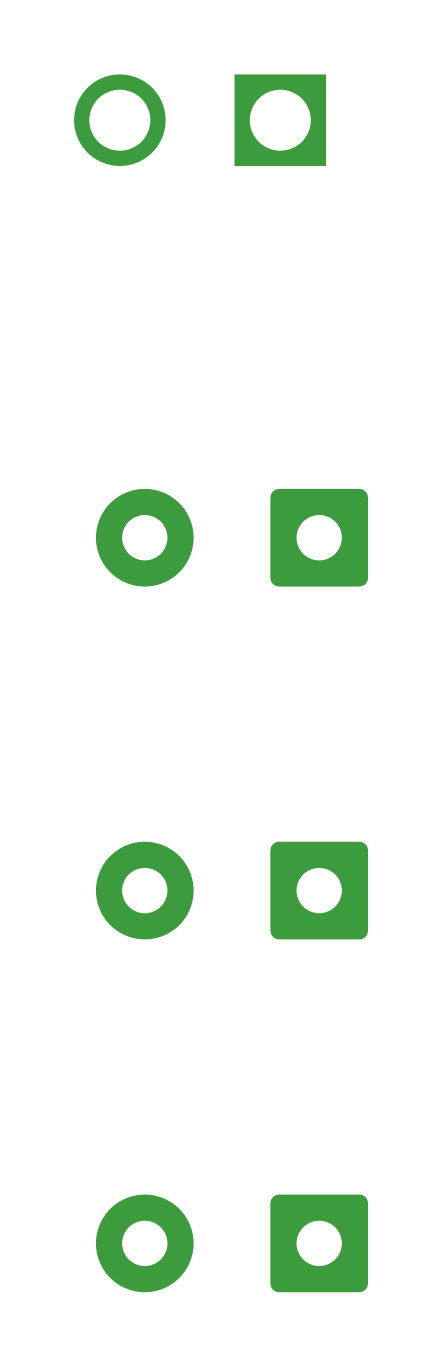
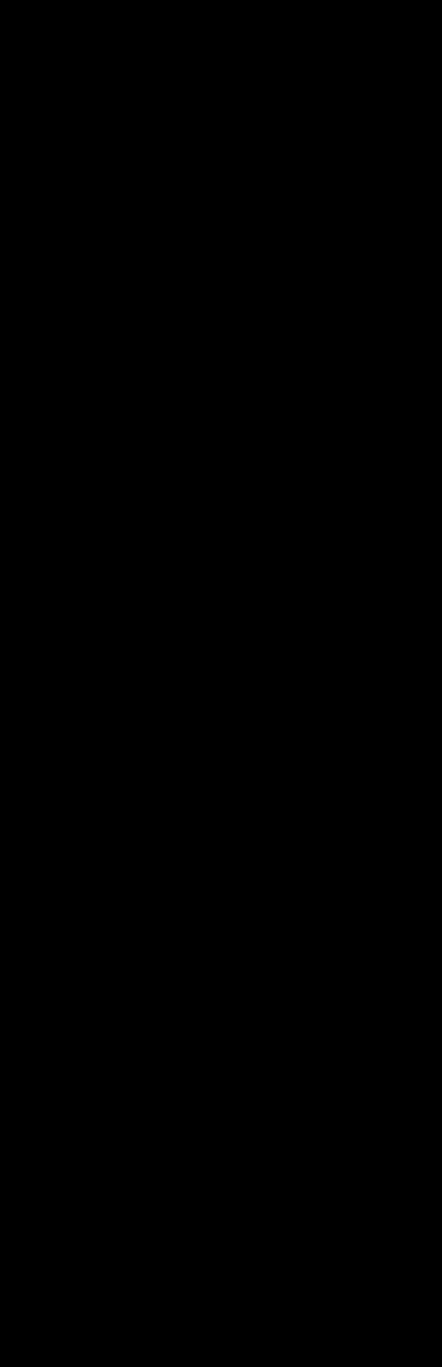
part: (200, 120) -> none
part: (231, 537) -> none
part: (231, 890) -> none
part: (231, 1243) -> none

